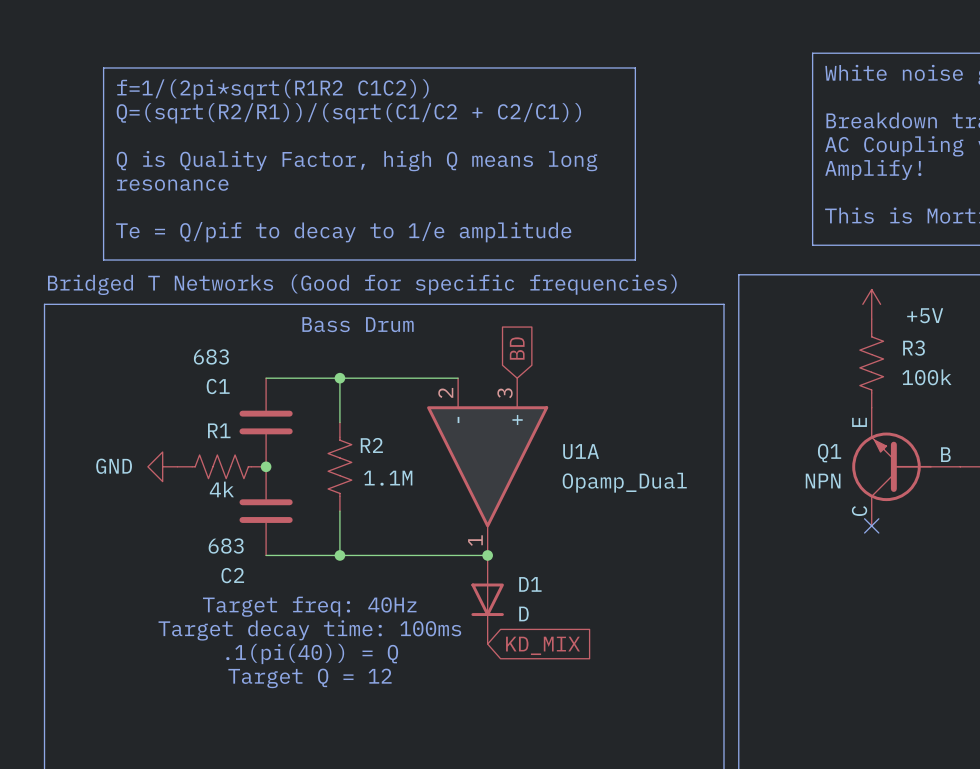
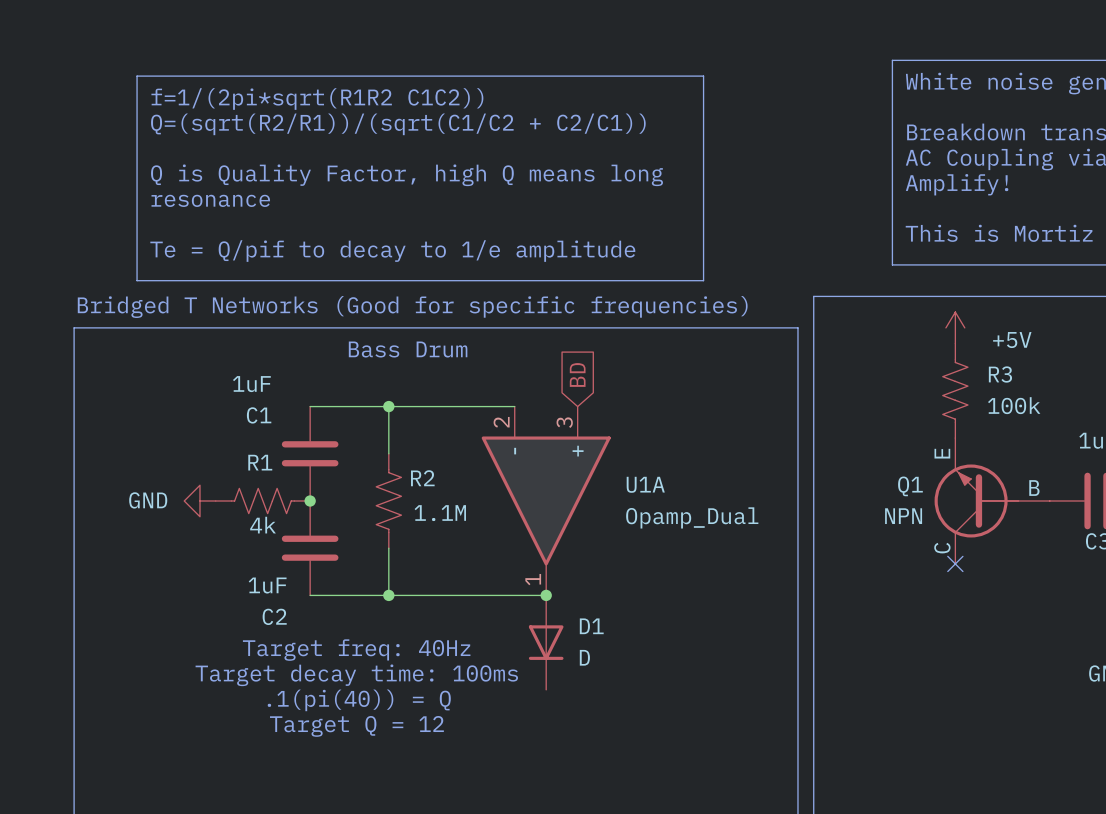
C1 value: 683 (211, 356) -> 1uF (251, 384)
C2 value: 683 (226, 546) -> 1uF (267, 585)
global label: KD_MIX (543, 645) -> none

